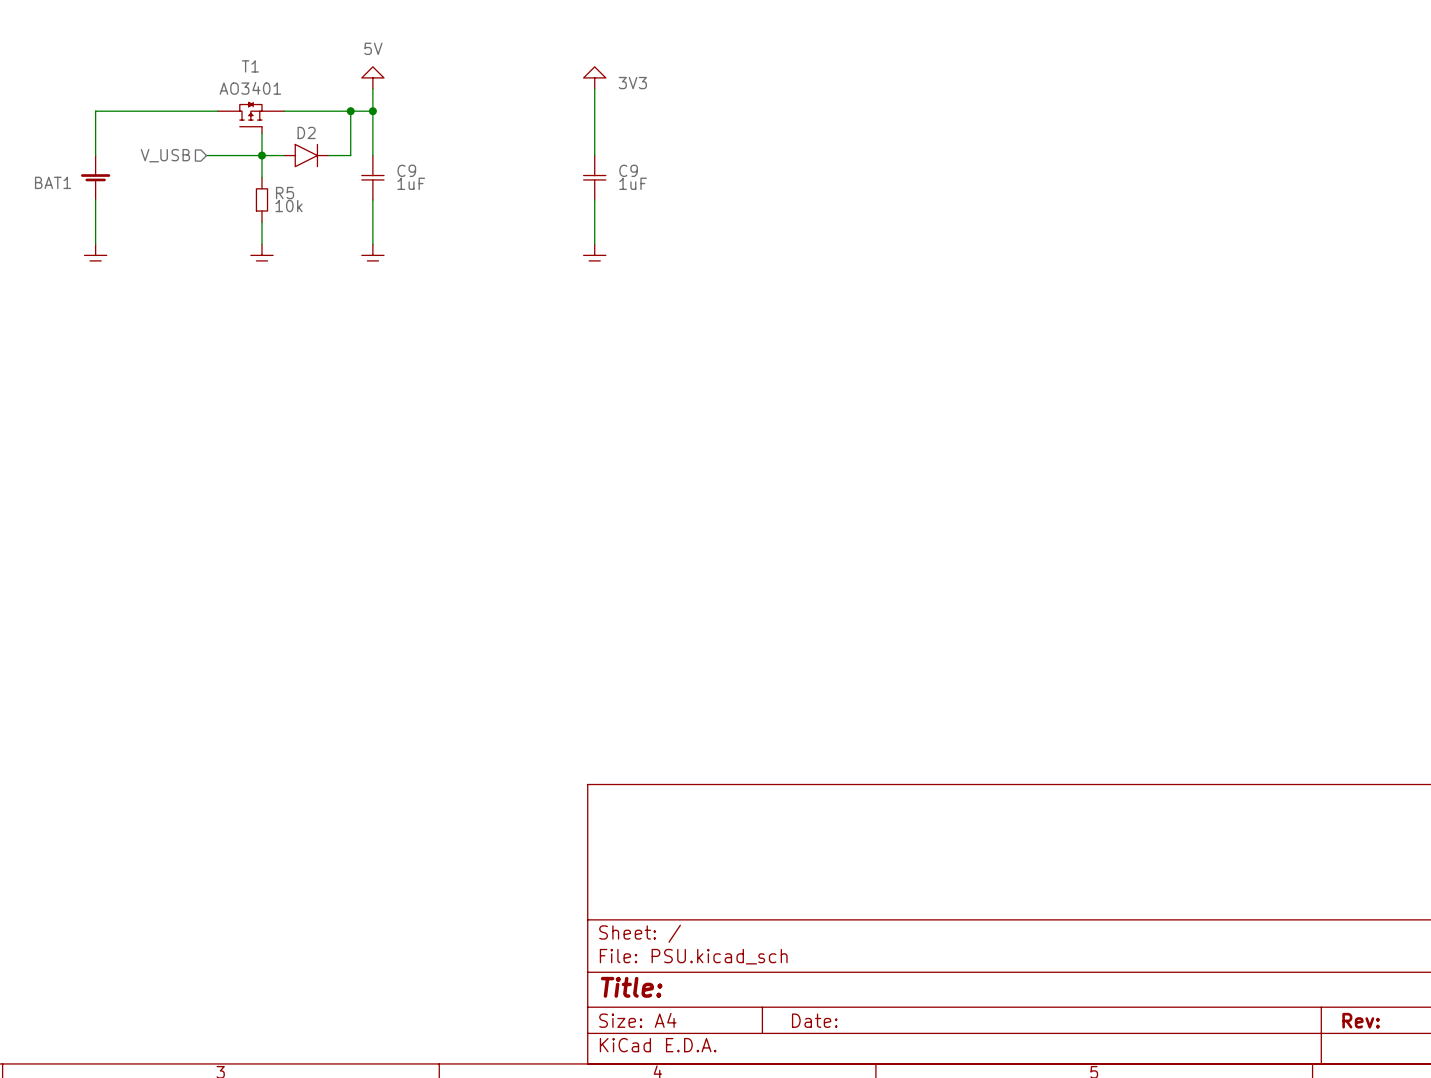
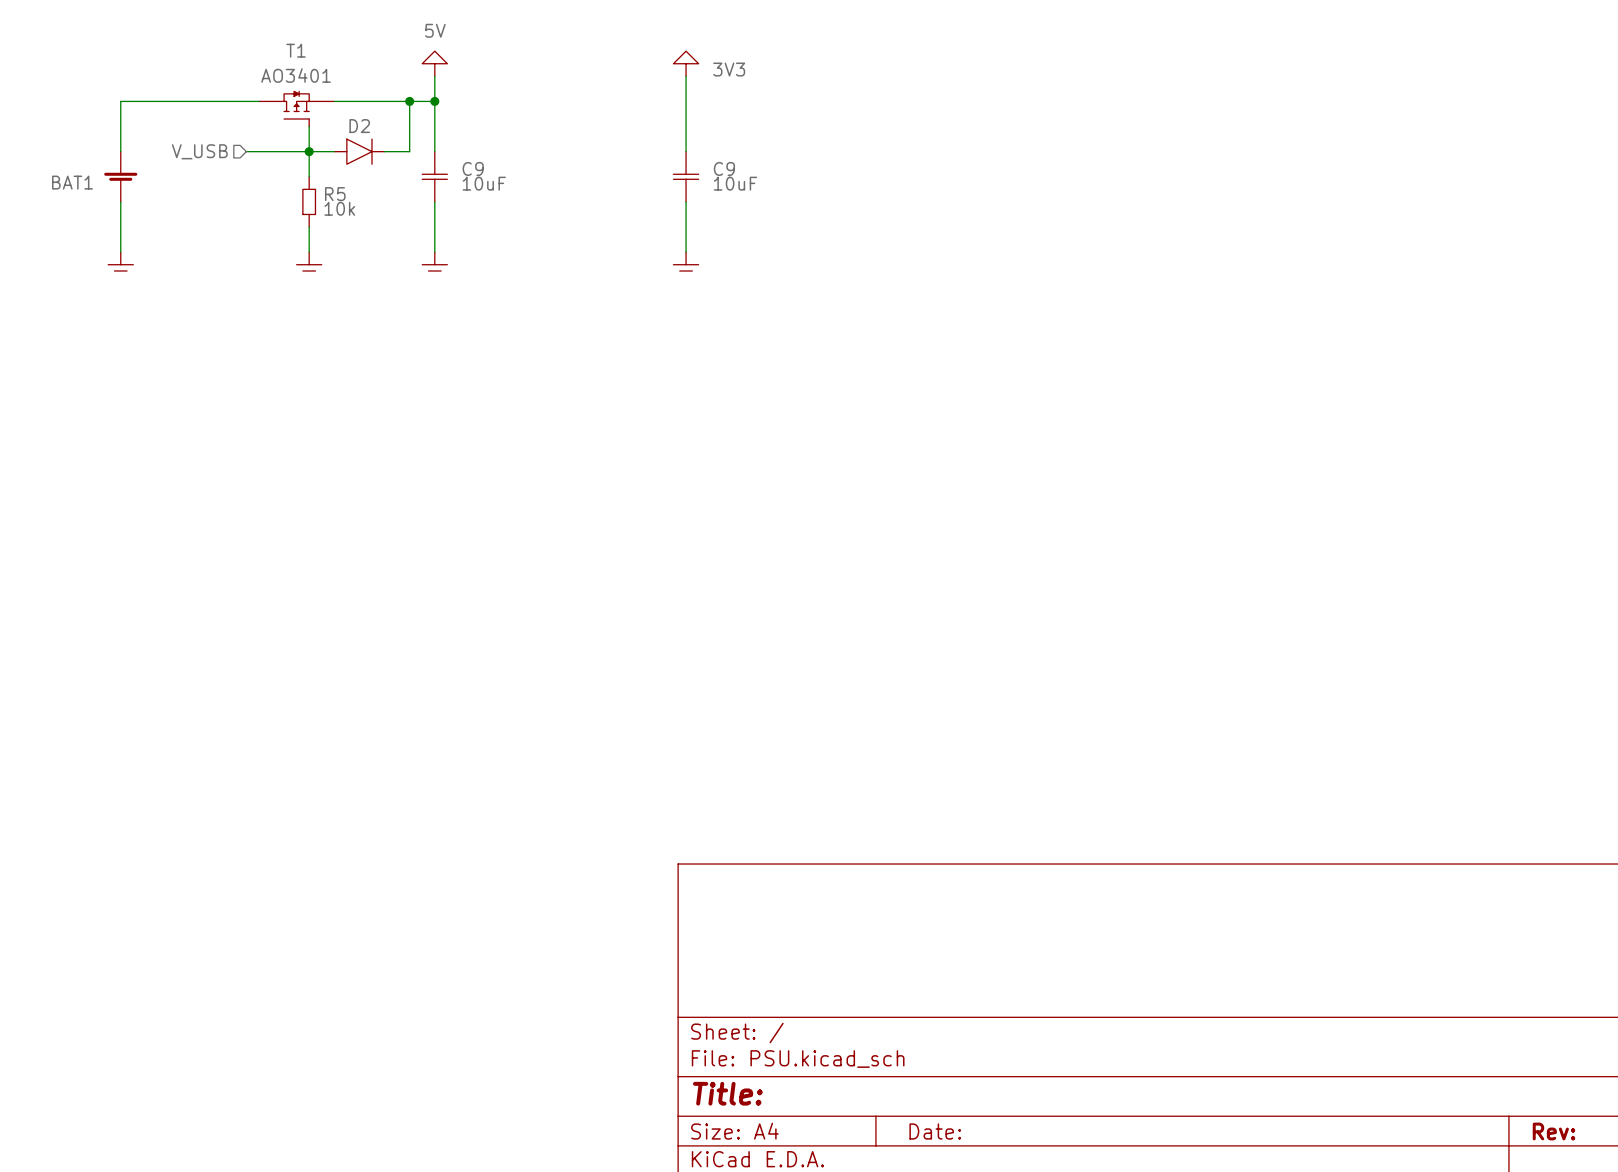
C9 value: 1uF (411, 183) -> 10uF (484, 183)
C9 value: 1uF (633, 183) -> 10uF (735, 183)

